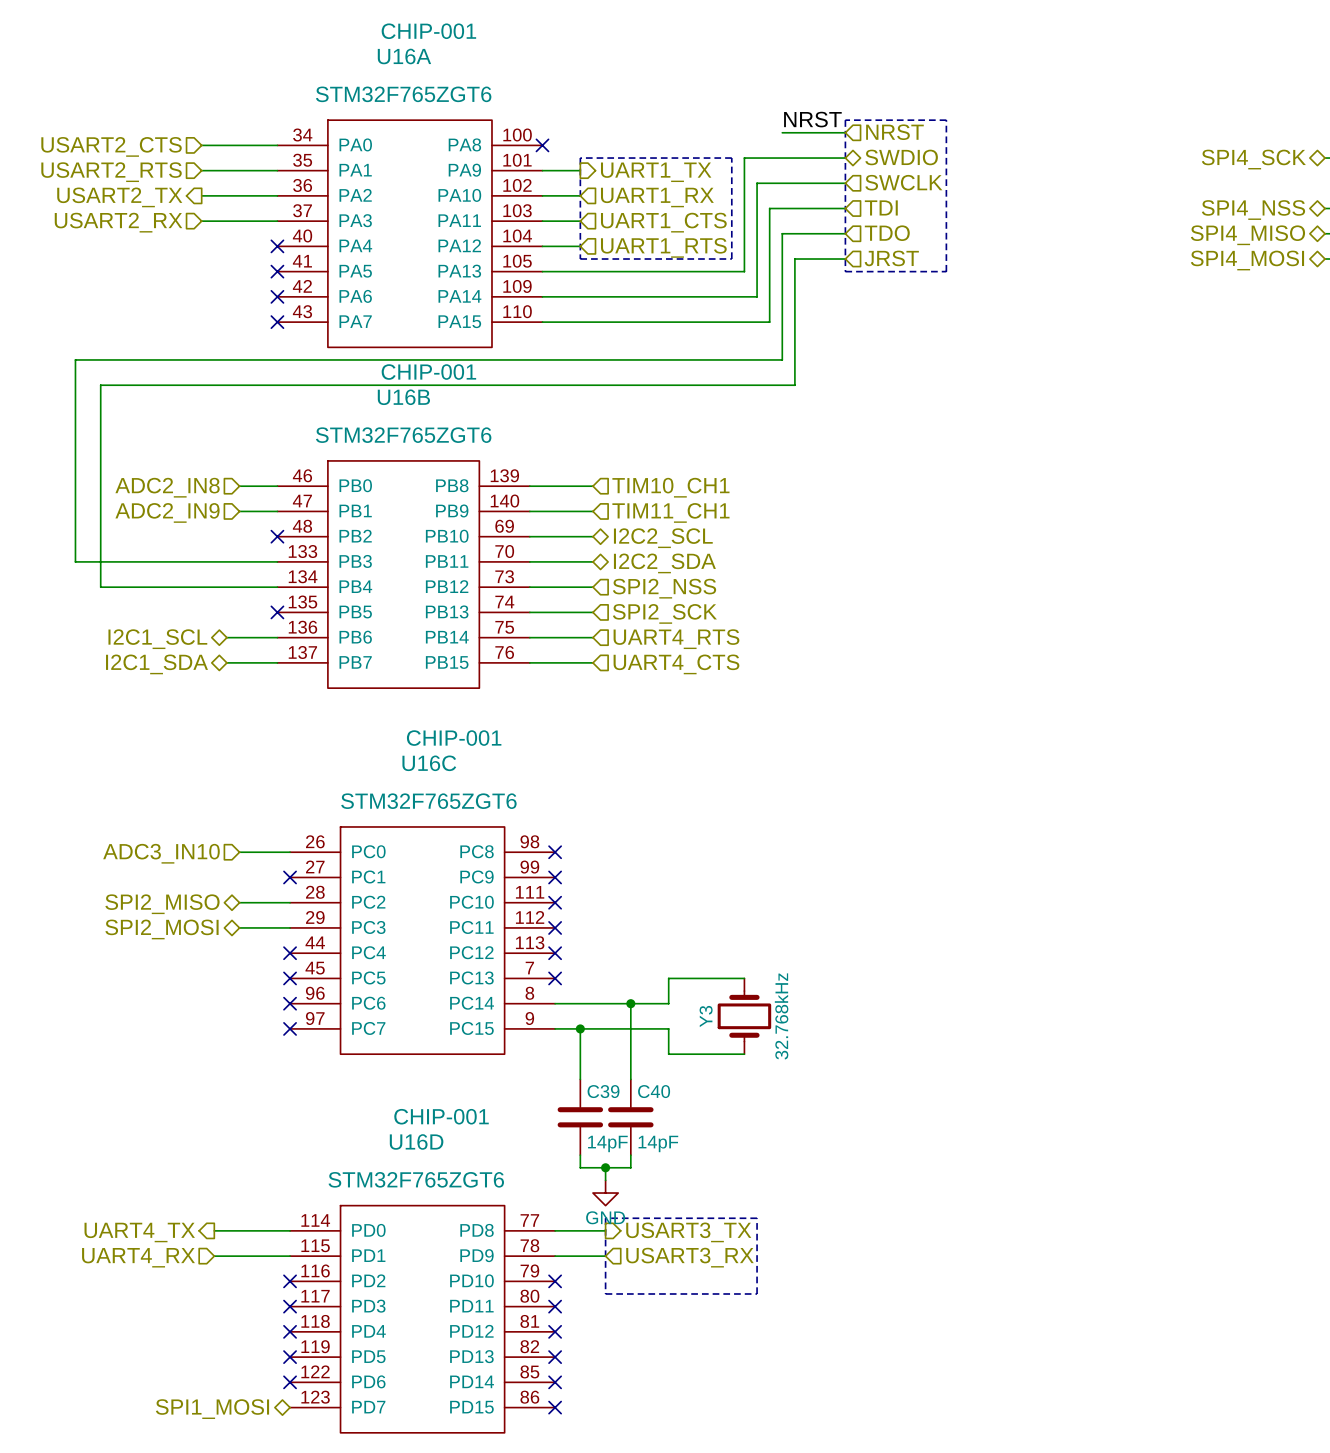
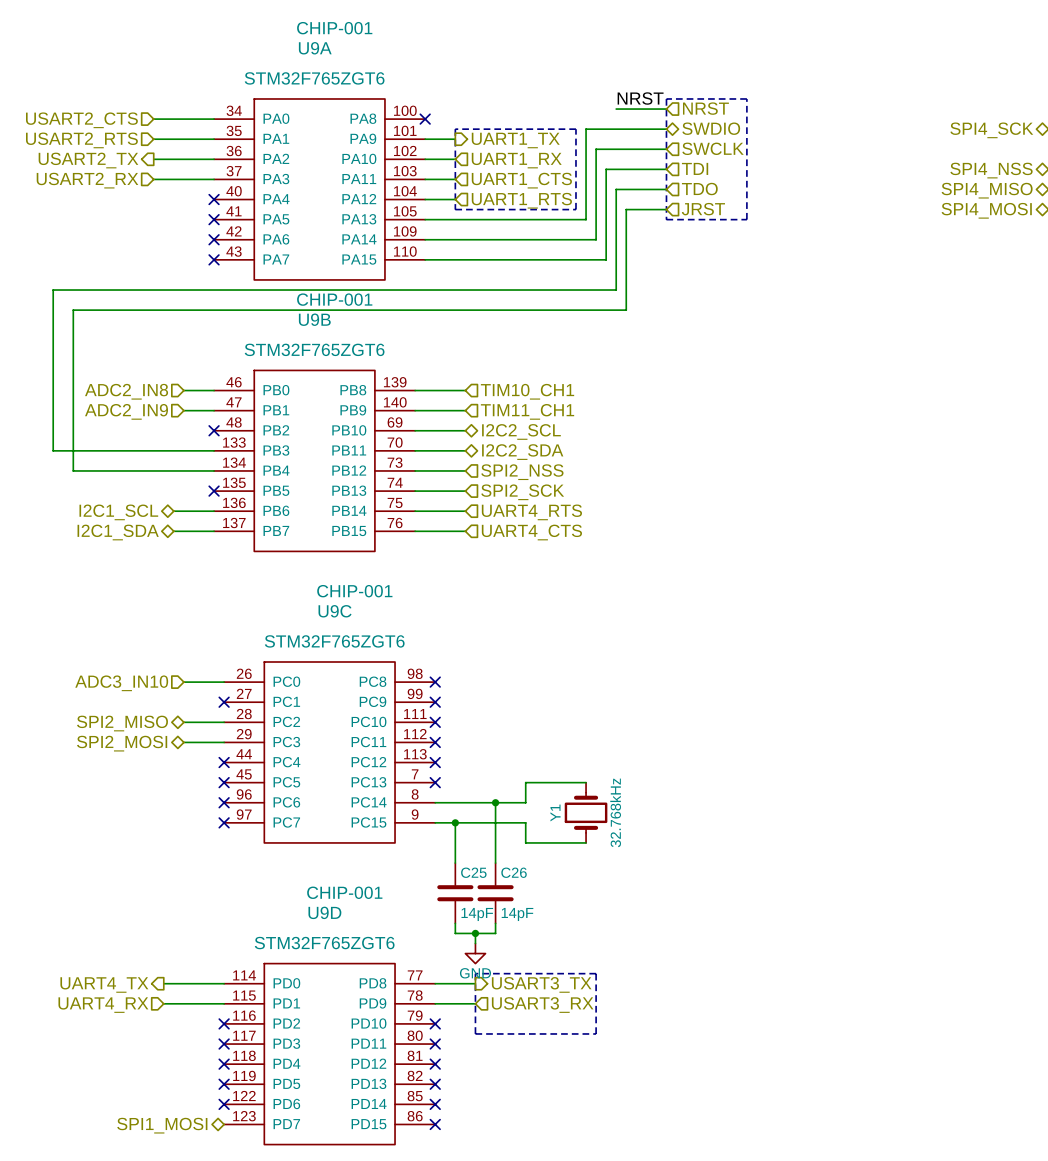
U16A name: U16A (404, 56) -> U9A (315, 48)
U16B name: U16B (403, 397) -> U9B (314, 319)
U16C name: U16C (429, 763) -> U9C (335, 611)
Y3 name: Y3 (706, 1016) -> Y1 (555, 813)
C39 name: C39 (603, 1091) -> C25 (473, 872)
C40 name: C40 (654, 1091) -> C26 (514, 872)
U16D name: U16D (416, 1141) -> U9D (324, 912)

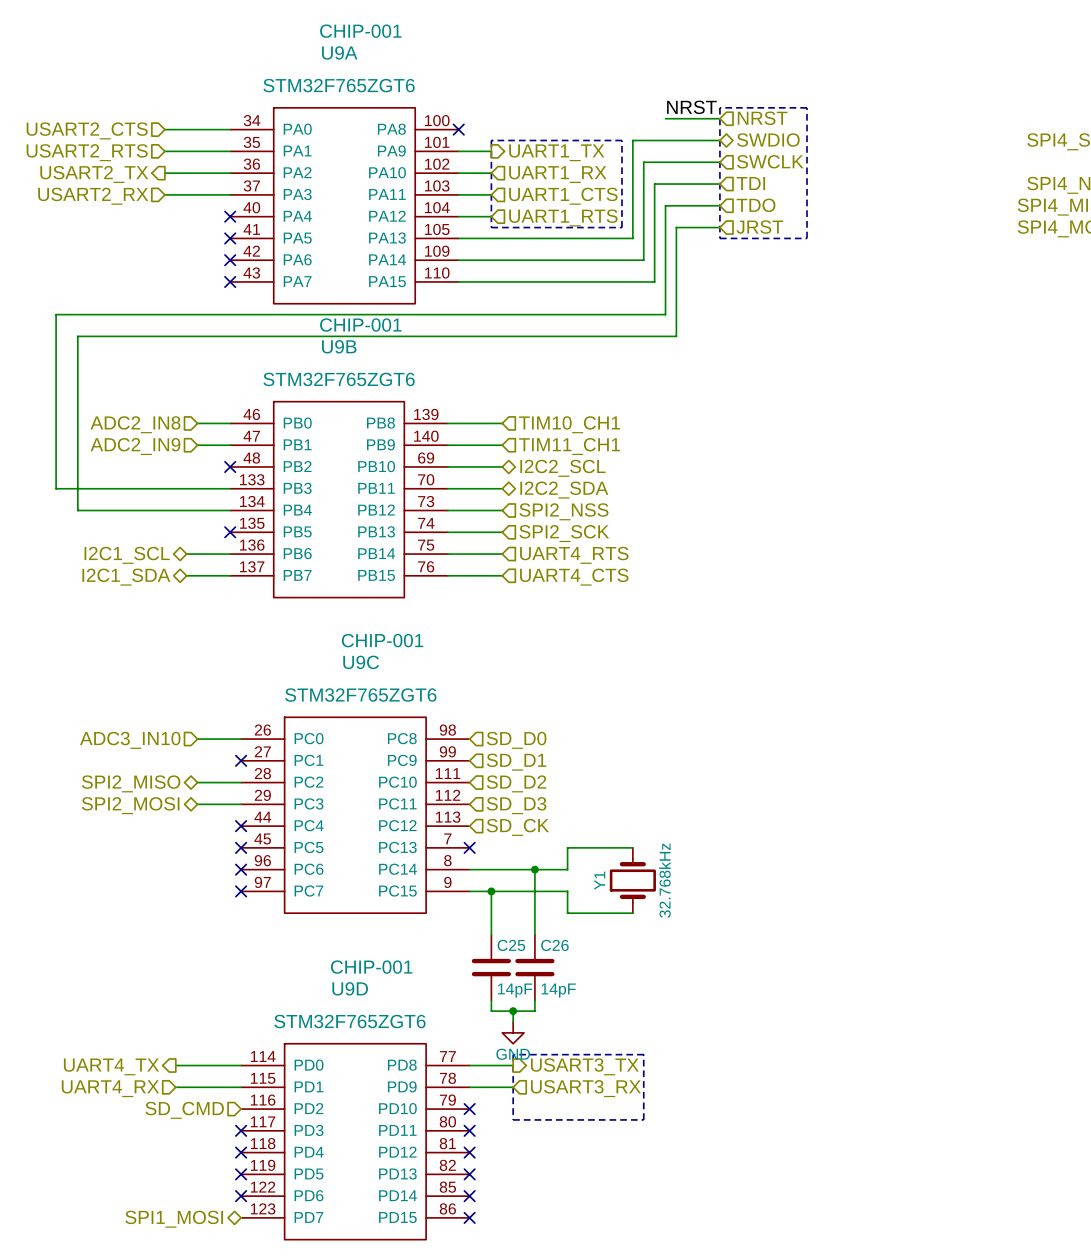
no-connect mark: (435, 682) -> none
hierarchical label: none -> SD_D0 (516, 740)
no-connect mark: (435, 702) -> none
hierarchical label: none -> SD_D1 (516, 762)
no-connect mark: (435, 722) -> none
hierarchical label: none -> SD_D2 (516, 783)
no-connect mark: (435, 742) -> none
hierarchical label: none -> SD_D3 (516, 805)
no-connect mark: (435, 762) -> none
hierarchical label: none -> SD_CK (517, 827)
no-connect mark: (224, 1023) -> none
hierarchical label: none -> SD_CMD (184, 1110)

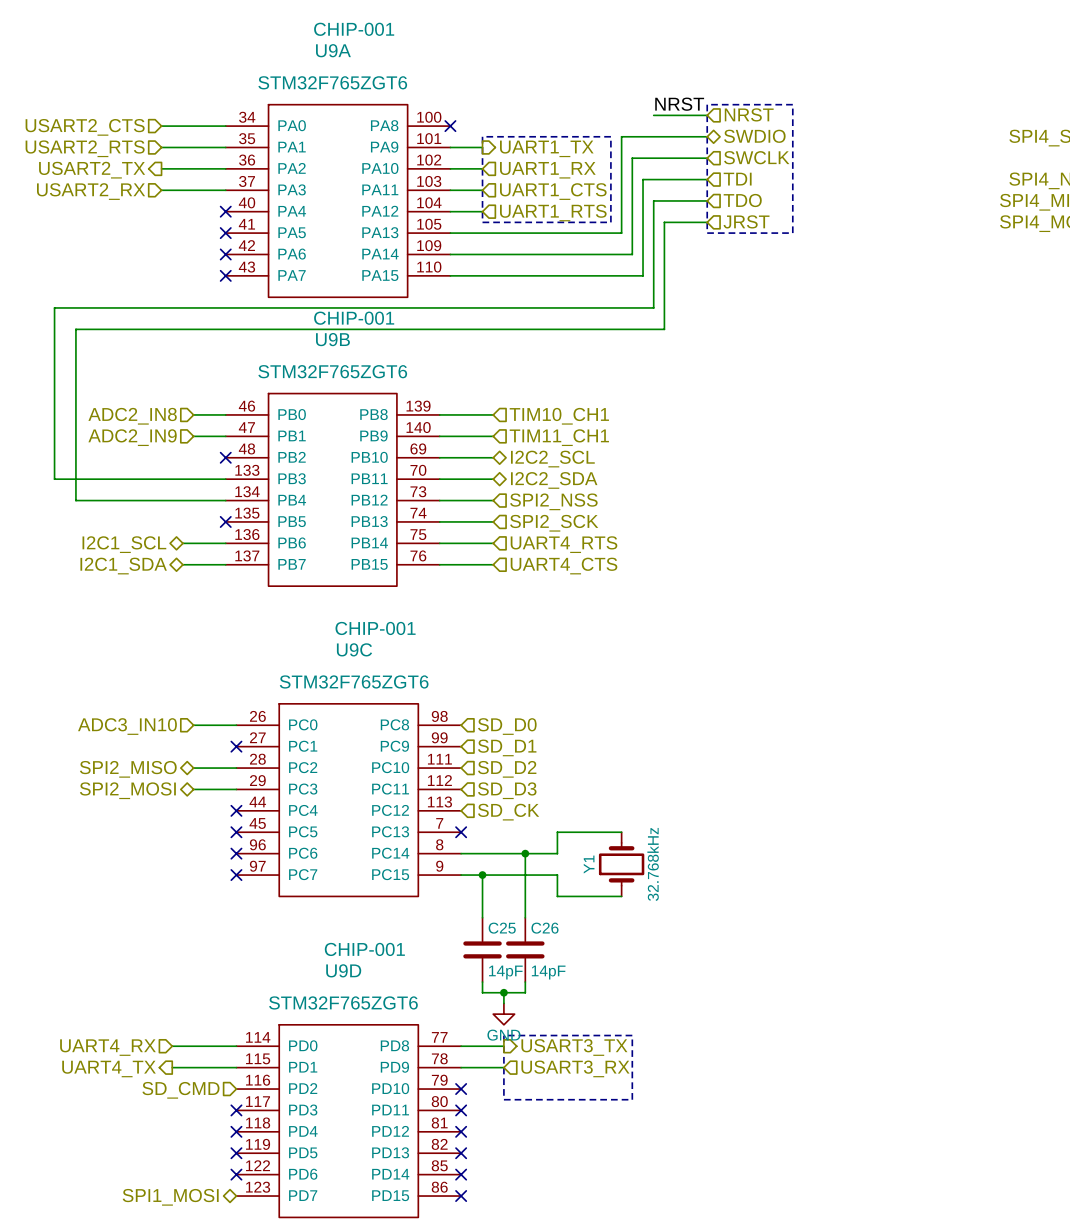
hierarchical label shape: output (111, 1066) -> input (107, 1047)
hierarchical label: UART4_TX (111, 1066) -> UART4_RX (107, 1047)
hierarchical label shape: input (110, 1088) -> output (109, 1069)
hierarchical label: UART4_RX (110, 1088) -> UART4_TX (109, 1069)

